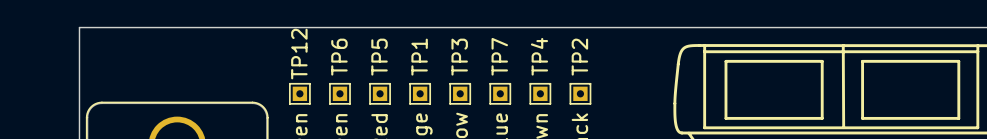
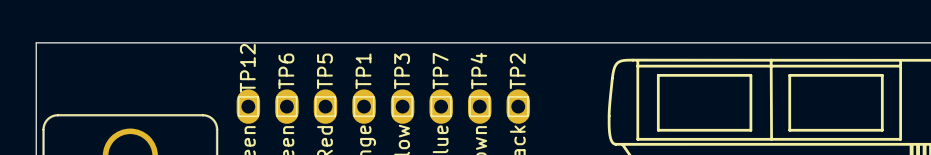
TP12 footprint: [289, 82, 311, 105] -> [236, 89, 261, 124]
TP6 footprint: [329, 82, 351, 105] -> [275, 89, 299, 124]
TP5 footprint: [369, 82, 391, 105] -> [313, 89, 338, 124]
TP1 footprint: [409, 82, 432, 105] -> [352, 89, 376, 124]
TP3 footprint: [449, 82, 472, 105] -> [390, 89, 415, 124]
TP7 footprint: [489, 82, 512, 105] -> [429, 89, 453, 124]
TP4 footprint: [529, 82, 552, 105] -> [467, 89, 492, 124]
TP2 footprint: [569, 82, 592, 105] -> [506, 89, 531, 124]

